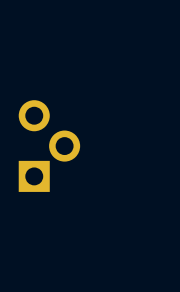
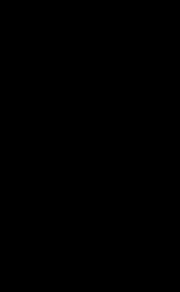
part: (49, 146) -> none

